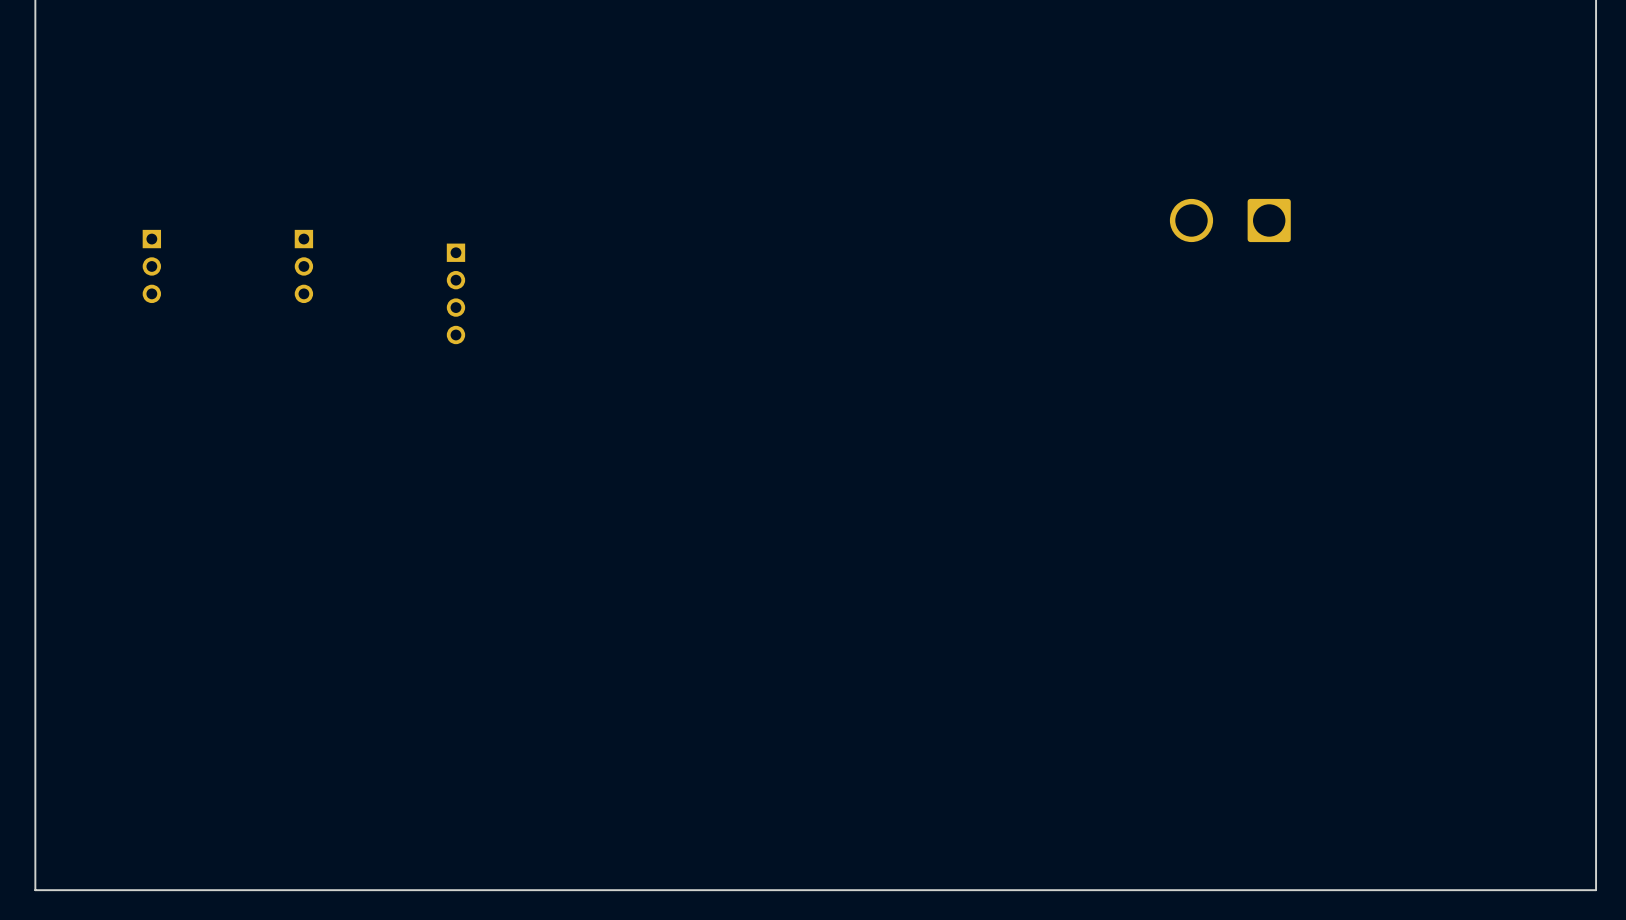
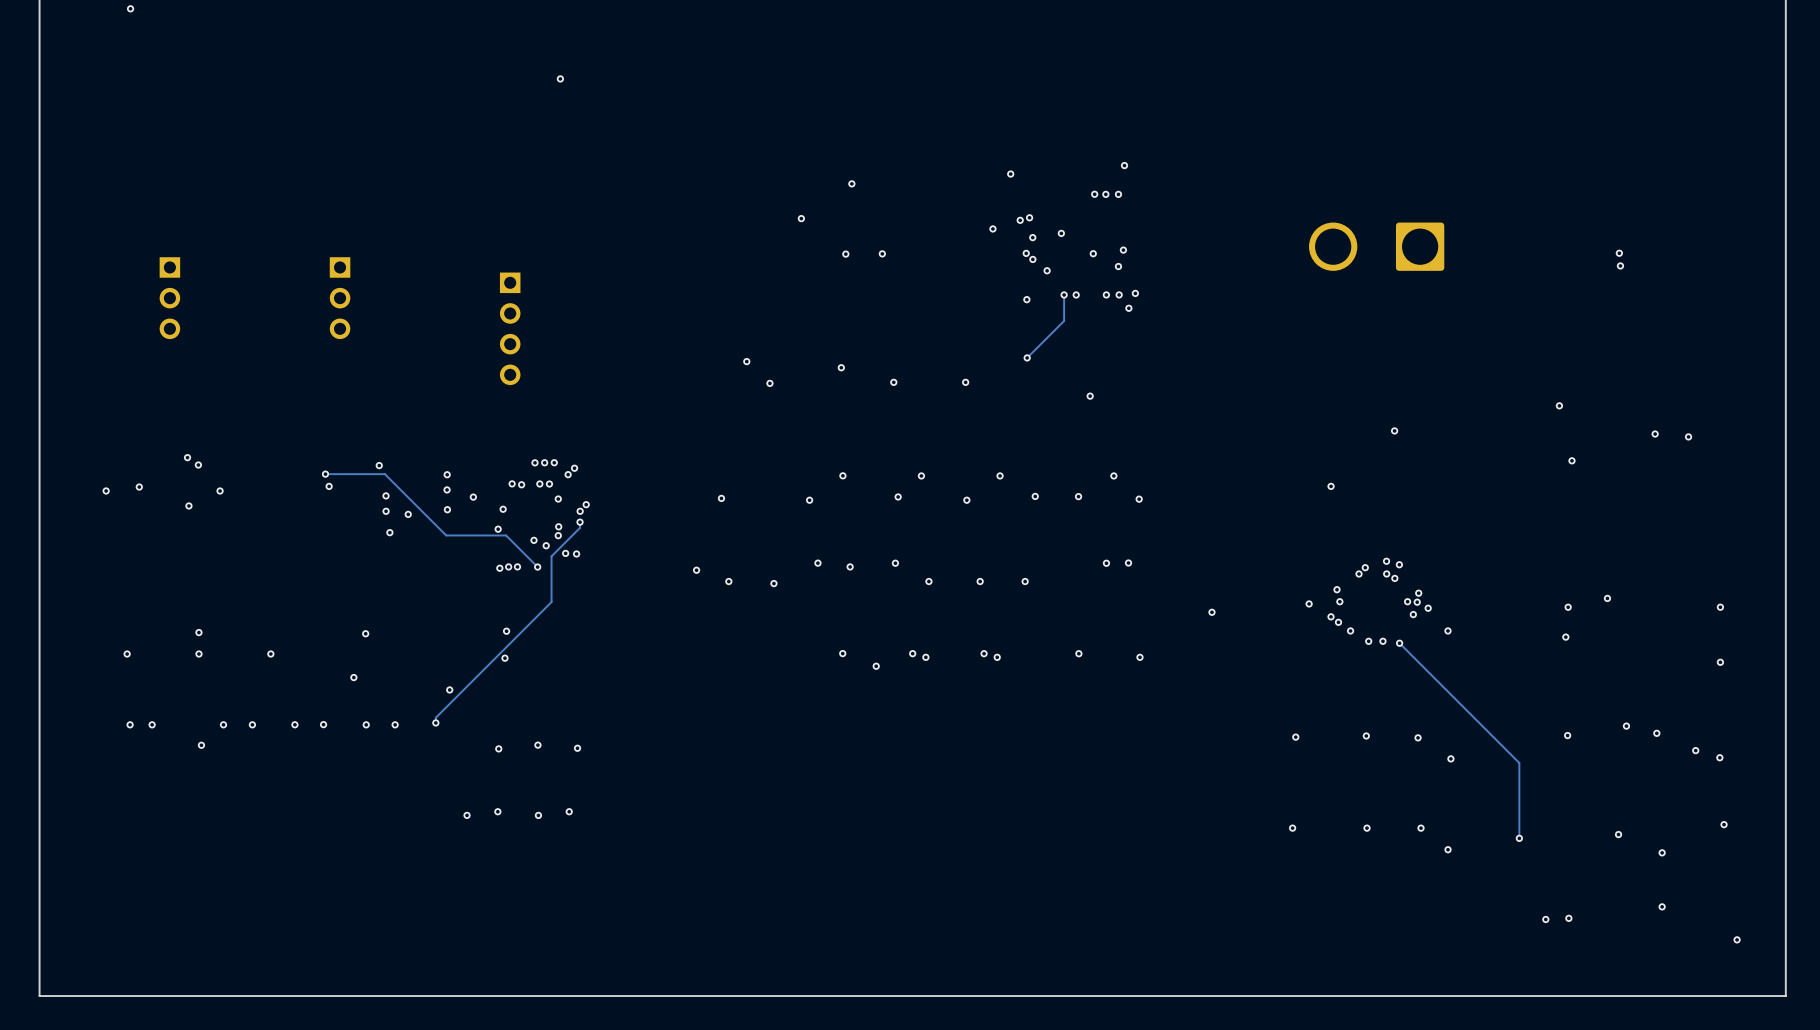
via: none -> (130, 8)
via: none -> (560, 78)
via: none -> (1124, 165)
via: none -> (1010, 174)
via: none -> (851, 183)
via: none -> (1094, 194)
via: none -> (1105, 194)
via: none -> (1118, 194)
via: none -> (1029, 217)
via: none -> (801, 218)
via: none -> (1020, 220)
via: none -> (992, 228)
via: none -> (1061, 233)
via: none -> (1032, 237)
via: none -> (1123, 250)
via: none -> (882, 253)
via: none -> (1026, 253)
via: none -> (1093, 253)
via: none -> (1619, 253)
via: none -> (845, 254)
via: none -> (1032, 259)
via: none -> (1620, 265)
via: none -> (1118, 266)
via: none -> (1047, 270)
via: none -> (1135, 293)
track: none -> (1064, 294) (1064, 320) (1027, 357)
via: none -> (1064, 294)
via: none -> (1076, 294)
via: none -> (1106, 294)
via: none -> (1119, 294)
via: none -> (1026, 299)
via: none -> (1128, 308)
via: none -> (1027, 357)
via: none -> (746, 361)
via: none -> (841, 367)
via: none -> (893, 382)
via: none -> (965, 382)
via: none -> (769, 383)
via: none -> (1090, 396)
via: none -> (1559, 405)
via: none -> (1394, 430)
via: none -> (1655, 434)
via: none -> (1688, 436)
via: none -> (187, 457)
via: none -> (1571, 460)
via: none -> (534, 462)
via: none -> (544, 462)
via: none -> (554, 462)
via: none -> (198, 465)
via: none -> (379, 465)
via: none -> (574, 468)
track: none -> (325, 474) (384, 474) (446, 535) (506, 535) (537, 567)
via: none -> (325, 474)
via: none -> (447, 474)
via: none -> (568, 474)
via: none -> (842, 475)
via: none -> (921, 475)
via: none -> (1000, 475)
via: none -> (1113, 475)
via: none -> (512, 483)
via: none -> (539, 483)
via: none -> (549, 484)
via: none -> (521, 484)
via: none -> (329, 486)
via: none -> (1331, 486)
via: none -> (139, 487)
via: none -> (447, 489)
via: none -> (106, 490)
via: none -> (220, 491)
via: none -> (386, 495)
via: none -> (1035, 496)
via: none -> (1078, 496)
via: none -> (473, 497)
via: none -> (898, 496)
via: none -> (558, 499)
via: none -> (721, 498)
via: none -> (1139, 499)
via: none -> (809, 500)
via: none -> (966, 500)
via: none -> (586, 504)
via: none -> (188, 505)
via: none -> (447, 509)
via: none -> (503, 509)
via: none -> (386, 511)
via: none -> (580, 511)
via: none -> (408, 514)
track: none -> (580, 522) (580, 527) (551, 556) (551, 602) (435, 717) (435, 722)
via: none -> (580, 522)
via: none -> (558, 526)
via: none -> (498, 529)
via: none -> (389, 532)
via: none -> (558, 535)
via: none -> (533, 540)
via: none -> (546, 545)
via: none -> (565, 553)
via: none -> (576, 553)
via: none -> (1386, 561)
via: none -> (817, 563)
via: none -> (895, 563)
via: none -> (1106, 563)
via: none -> (1128, 563)
via: none -> (1399, 564)
via: none -> (508, 566)
via: none -> (517, 566)
via: none -> (537, 567)
via: none -> (850, 566)
via: none -> (499, 568)
via: none -> (1365, 567)
via: none -> (696, 570)
via: none -> (1359, 573)
via: none -> (1386, 573)
via: none -> (1394, 578)
via: none -> (728, 581)
via: none -> (928, 581)
via: none -> (980, 581)
via: none -> (1025, 581)
via: none -> (773, 583)
via: none -> (1336, 589)
via: none -> (1418, 593)
via: none -> (1607, 598)
via: none -> (1339, 601)
via: none -> (1407, 601)
via: none -> (1417, 602)
via: none -> (1309, 603)
via: none -> (1568, 607)
via: none -> (1720, 607)
via: none -> (1428, 608)
via: none -> (1211, 612)
via: none -> (1413, 614)
via: none -> (1331, 616)
via: none -> (1338, 622)
via: none -> (1350, 630)
via: none -> (1447, 630)
via: none -> (506, 631)
via: none -> (198, 632)
via: none -> (365, 633)
via: none -> (1565, 637)
via: none -> (1368, 641)
via: none -> (1382, 641)
track: none -> (1399, 643) (1519, 763) (1519, 838)
via: none -> (1399, 643)
via: none -> (127, 654)
via: none -> (198, 654)
via: none -> (270, 654)
via: none -> (842, 653)
via: none -> (912, 653)
via: none -> (984, 653)
via: none -> (1078, 653)
via: none -> (925, 657)
via: none -> (997, 657)
via: none -> (1139, 657)
via: none -> (504, 658)
via: none -> (1720, 662)
via: none -> (876, 666)
via: none -> (353, 677)
via: none -> (449, 689)
via: none -> (435, 722)
via: none -> (130, 724)
via: none -> (152, 724)
via: none -> (223, 724)
via: none -> (252, 724)
via: none -> (294, 724)
via: none -> (323, 724)
via: none -> (366, 724)
via: none -> (395, 724)
via: none -> (1626, 726)
via: none -> (1656, 733)
via: none -> (1366, 735)
via: none -> (1567, 735)
via: none -> (1295, 737)
via: none -> (1418, 737)
via: none -> (537, 745)
via: none -> (201, 745)
via: none -> (577, 748)
via: none -> (498, 748)
via: none -> (1695, 750)
via: none -> (1719, 757)
via: none -> (1450, 758)
via: none -> (497, 811)
via: none -> (569, 811)
via: none -> (467, 815)
via: none -> (538, 815)
via: none -> (1724, 824)
via: none -> (1292, 828)
via: none -> (1367, 828)
via: none -> (1421, 828)
via: none -> (1618, 834)
via: none -> (1519, 838)
via: none -> (1448, 849)
via: none -> (1662, 852)
via: none -> (1662, 906)
via: none -> (1568, 918)
via: none -> (1545, 919)
via: none -> (1737, 939)

